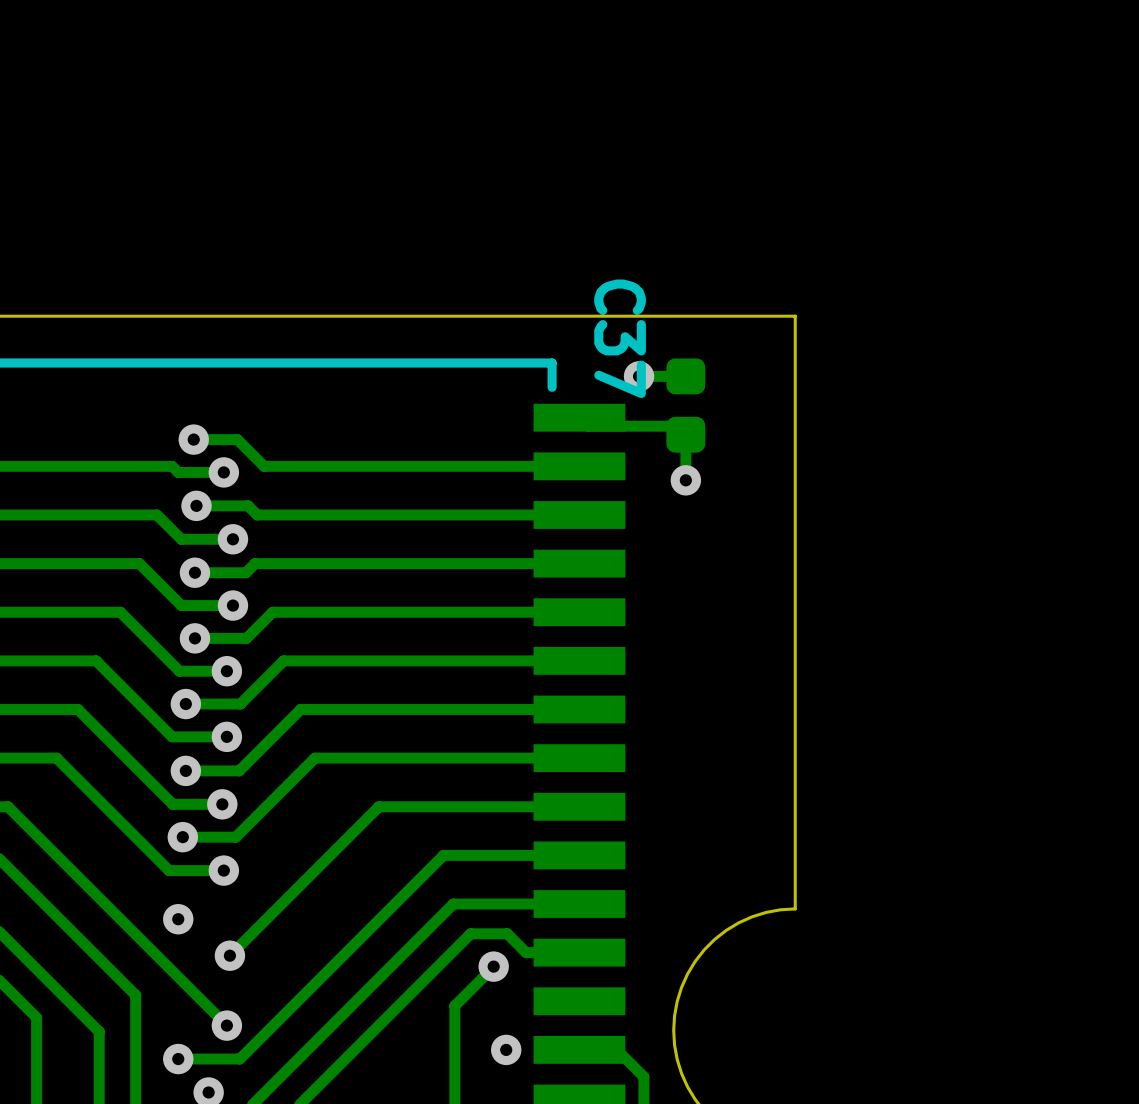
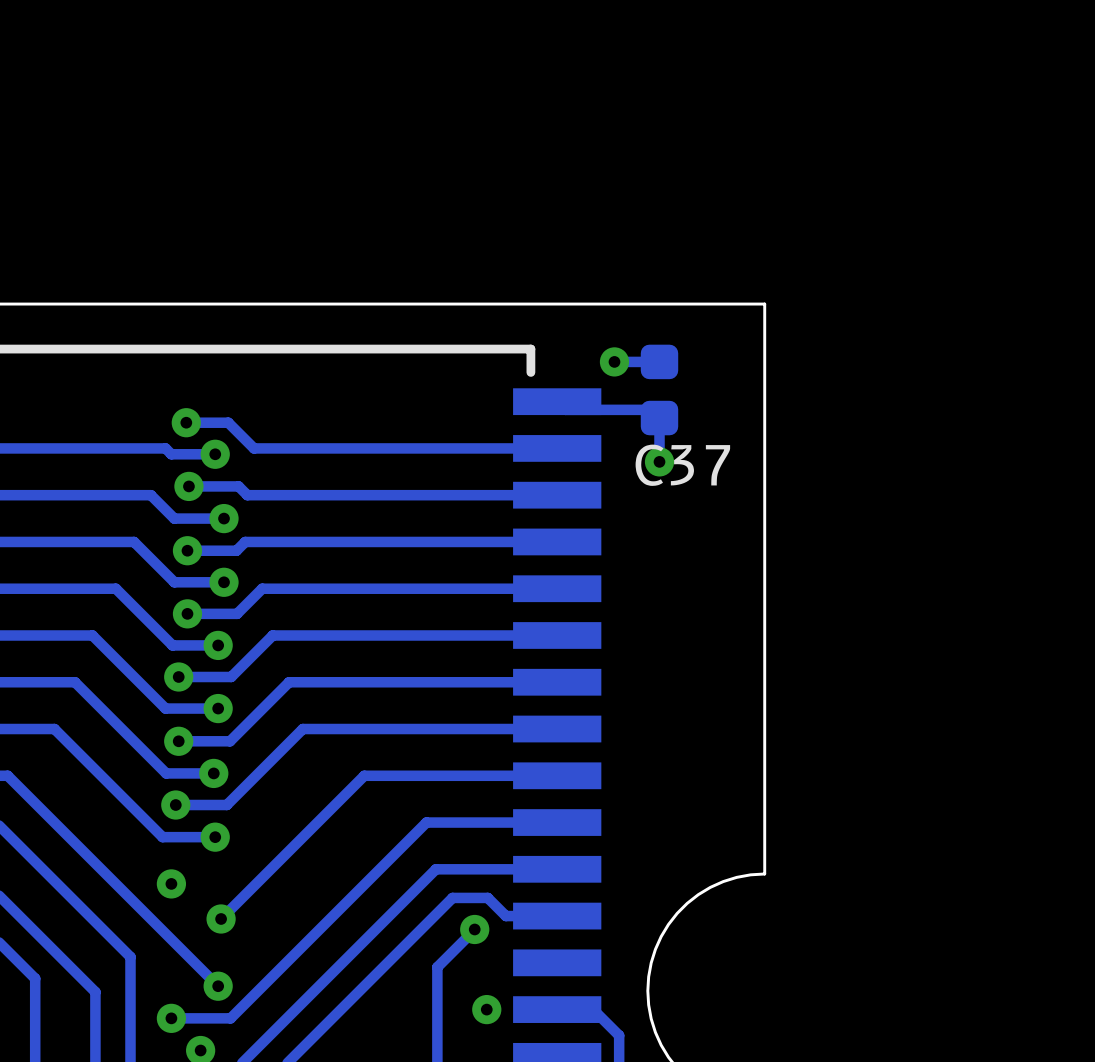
C37 name rotation: 0° (620, 338) -> 90° counterclockwise (682, 465)
C37 name position: C37 (620, 338) -> C37 (682, 465)

